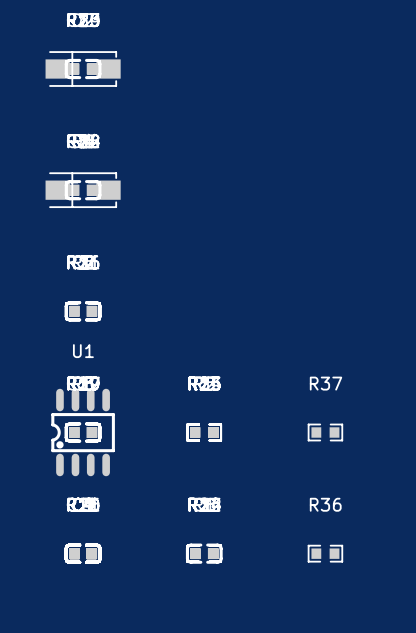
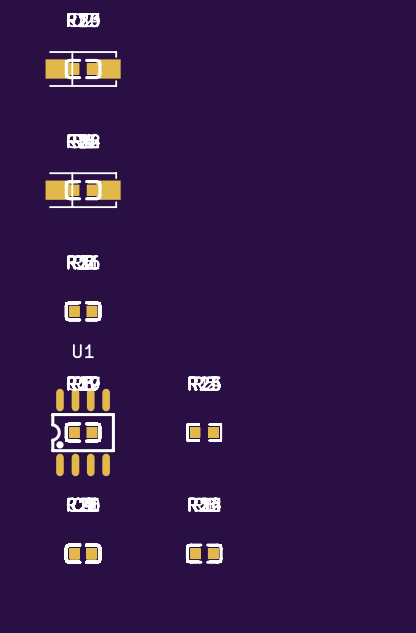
part: (204, 432) -> none
R37: (325, 432) -> none
R36: (325, 553) -> none

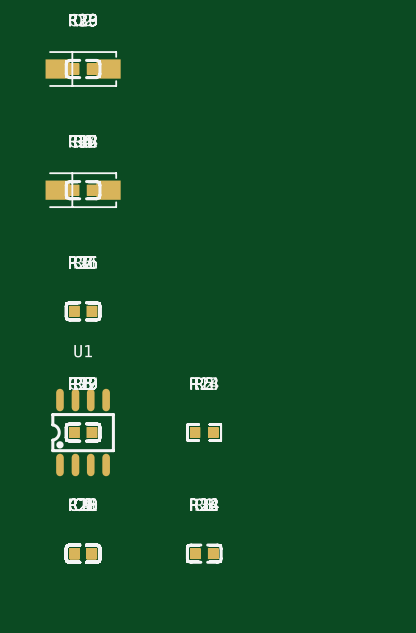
part: (204, 432) -> none

